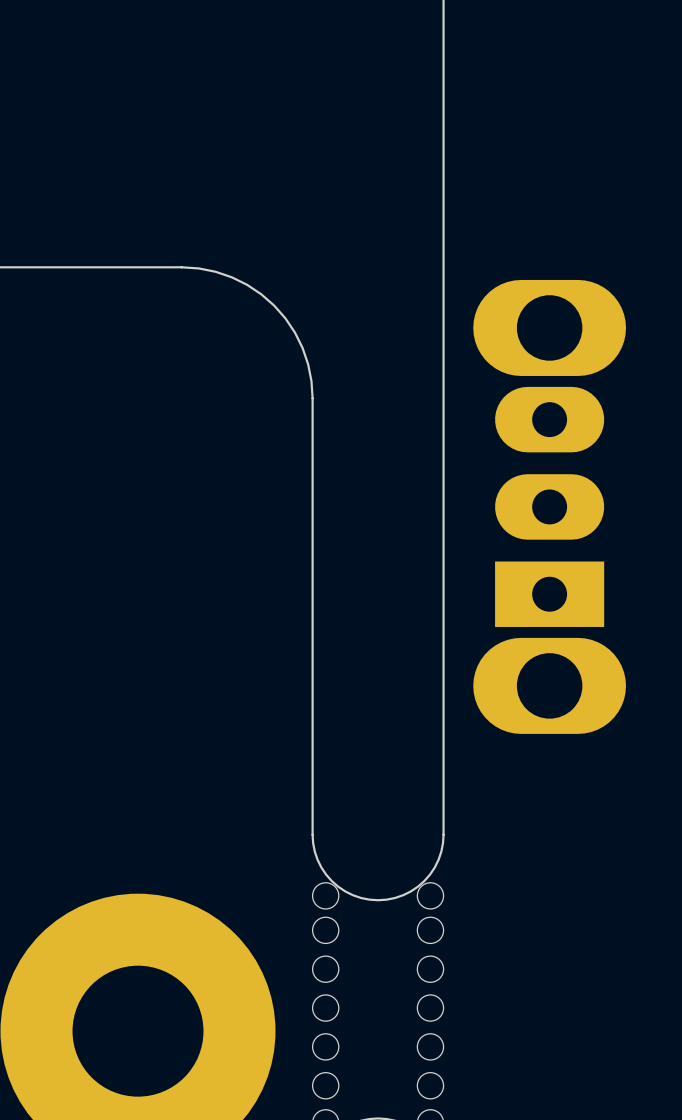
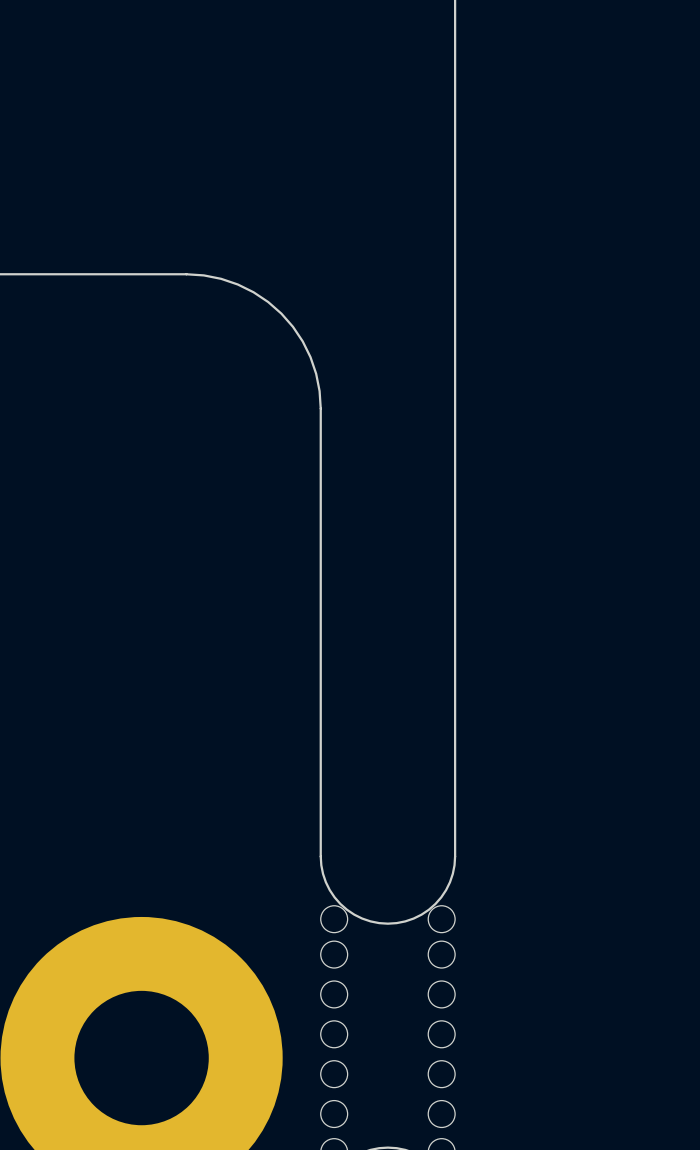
part: (549, 506) -> none

